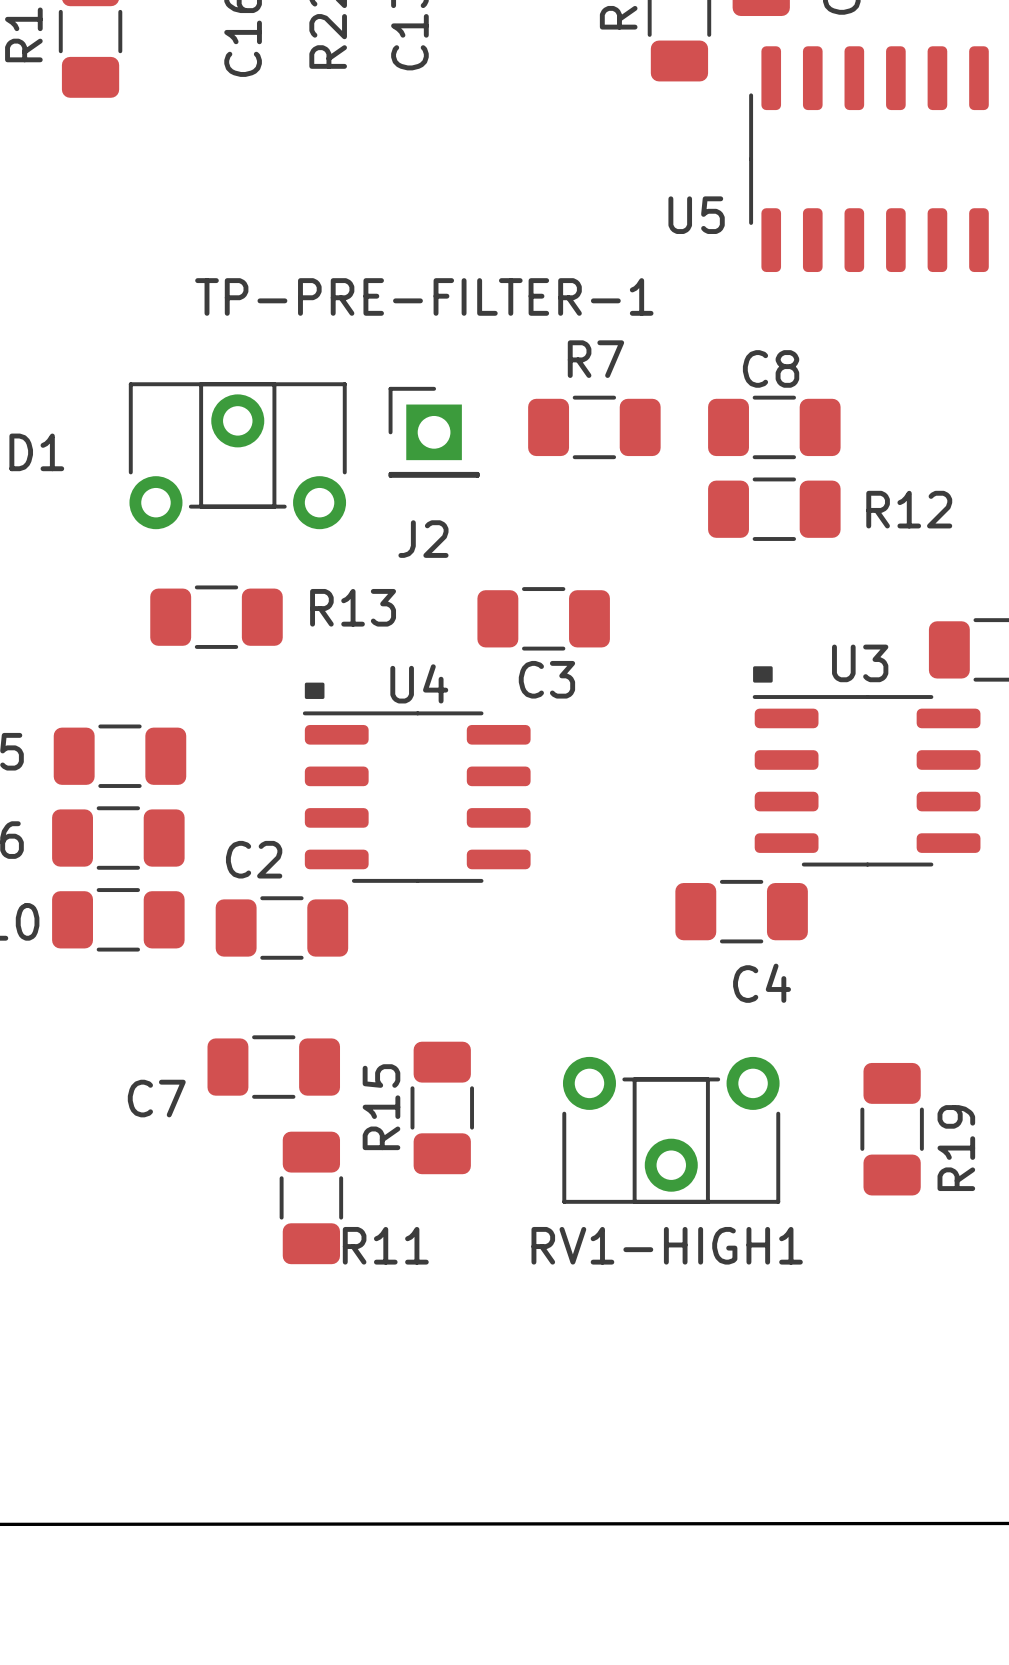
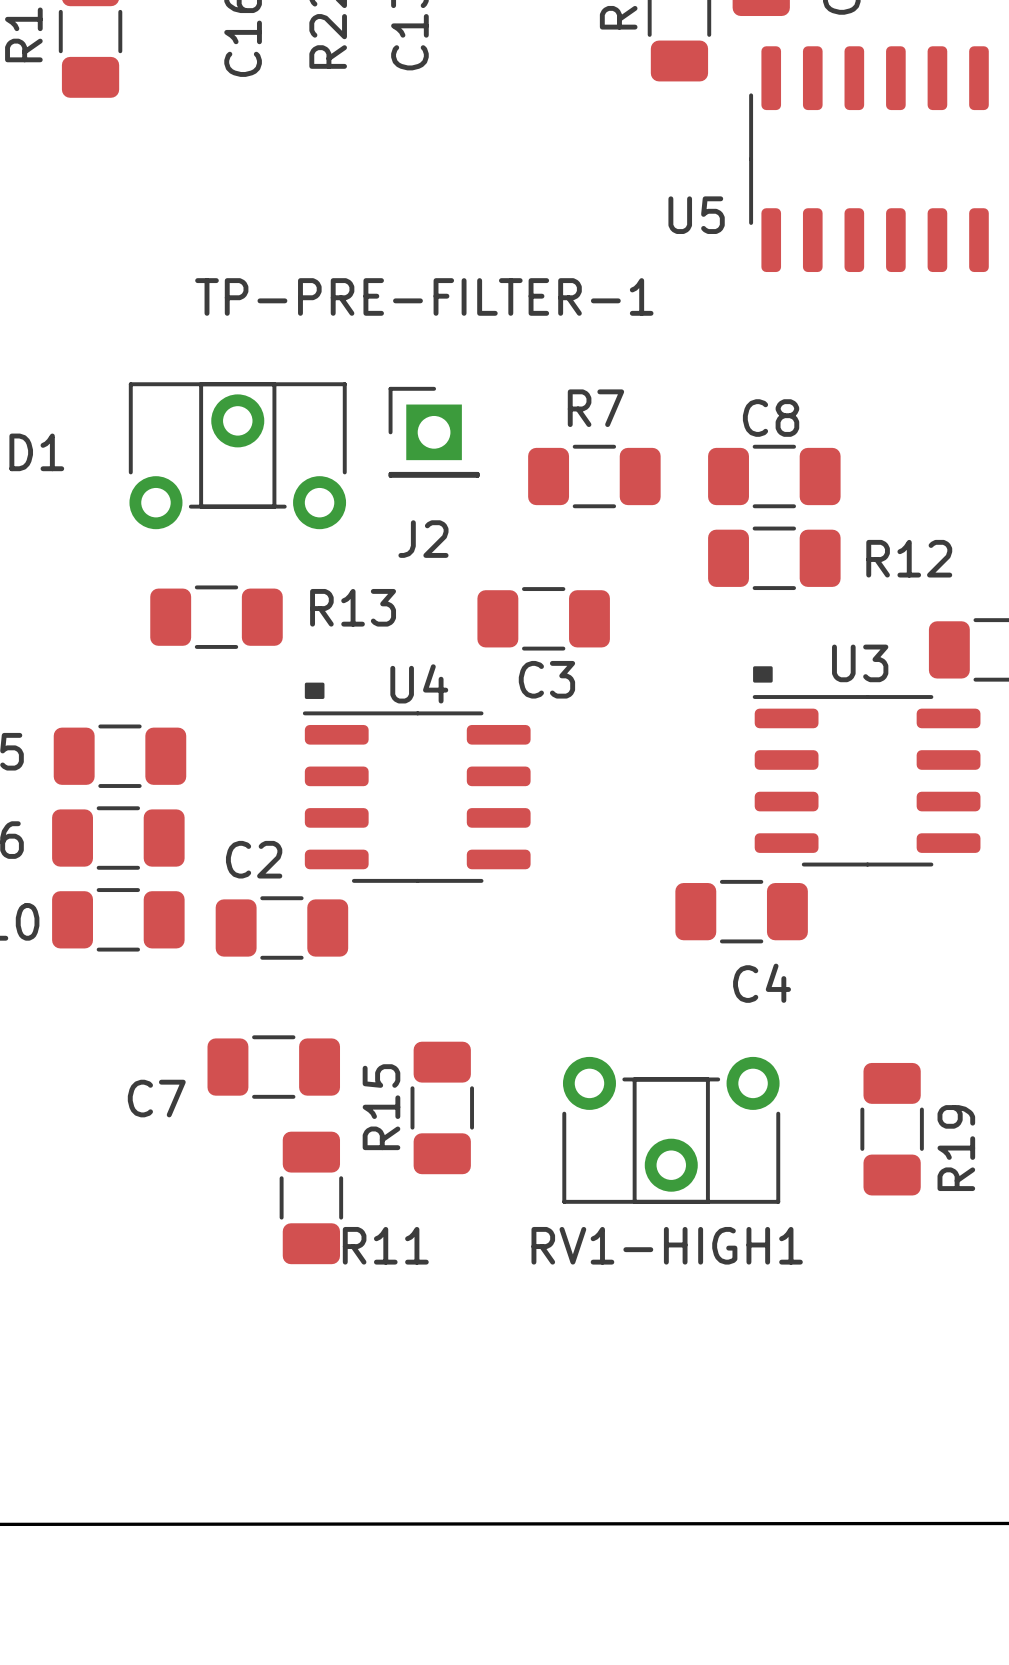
R7 position: (594, 427) -> (594, 476)
C8 position: (774, 427) -> (774, 476)
R12 position: (774, 509) -> (774, 558)

